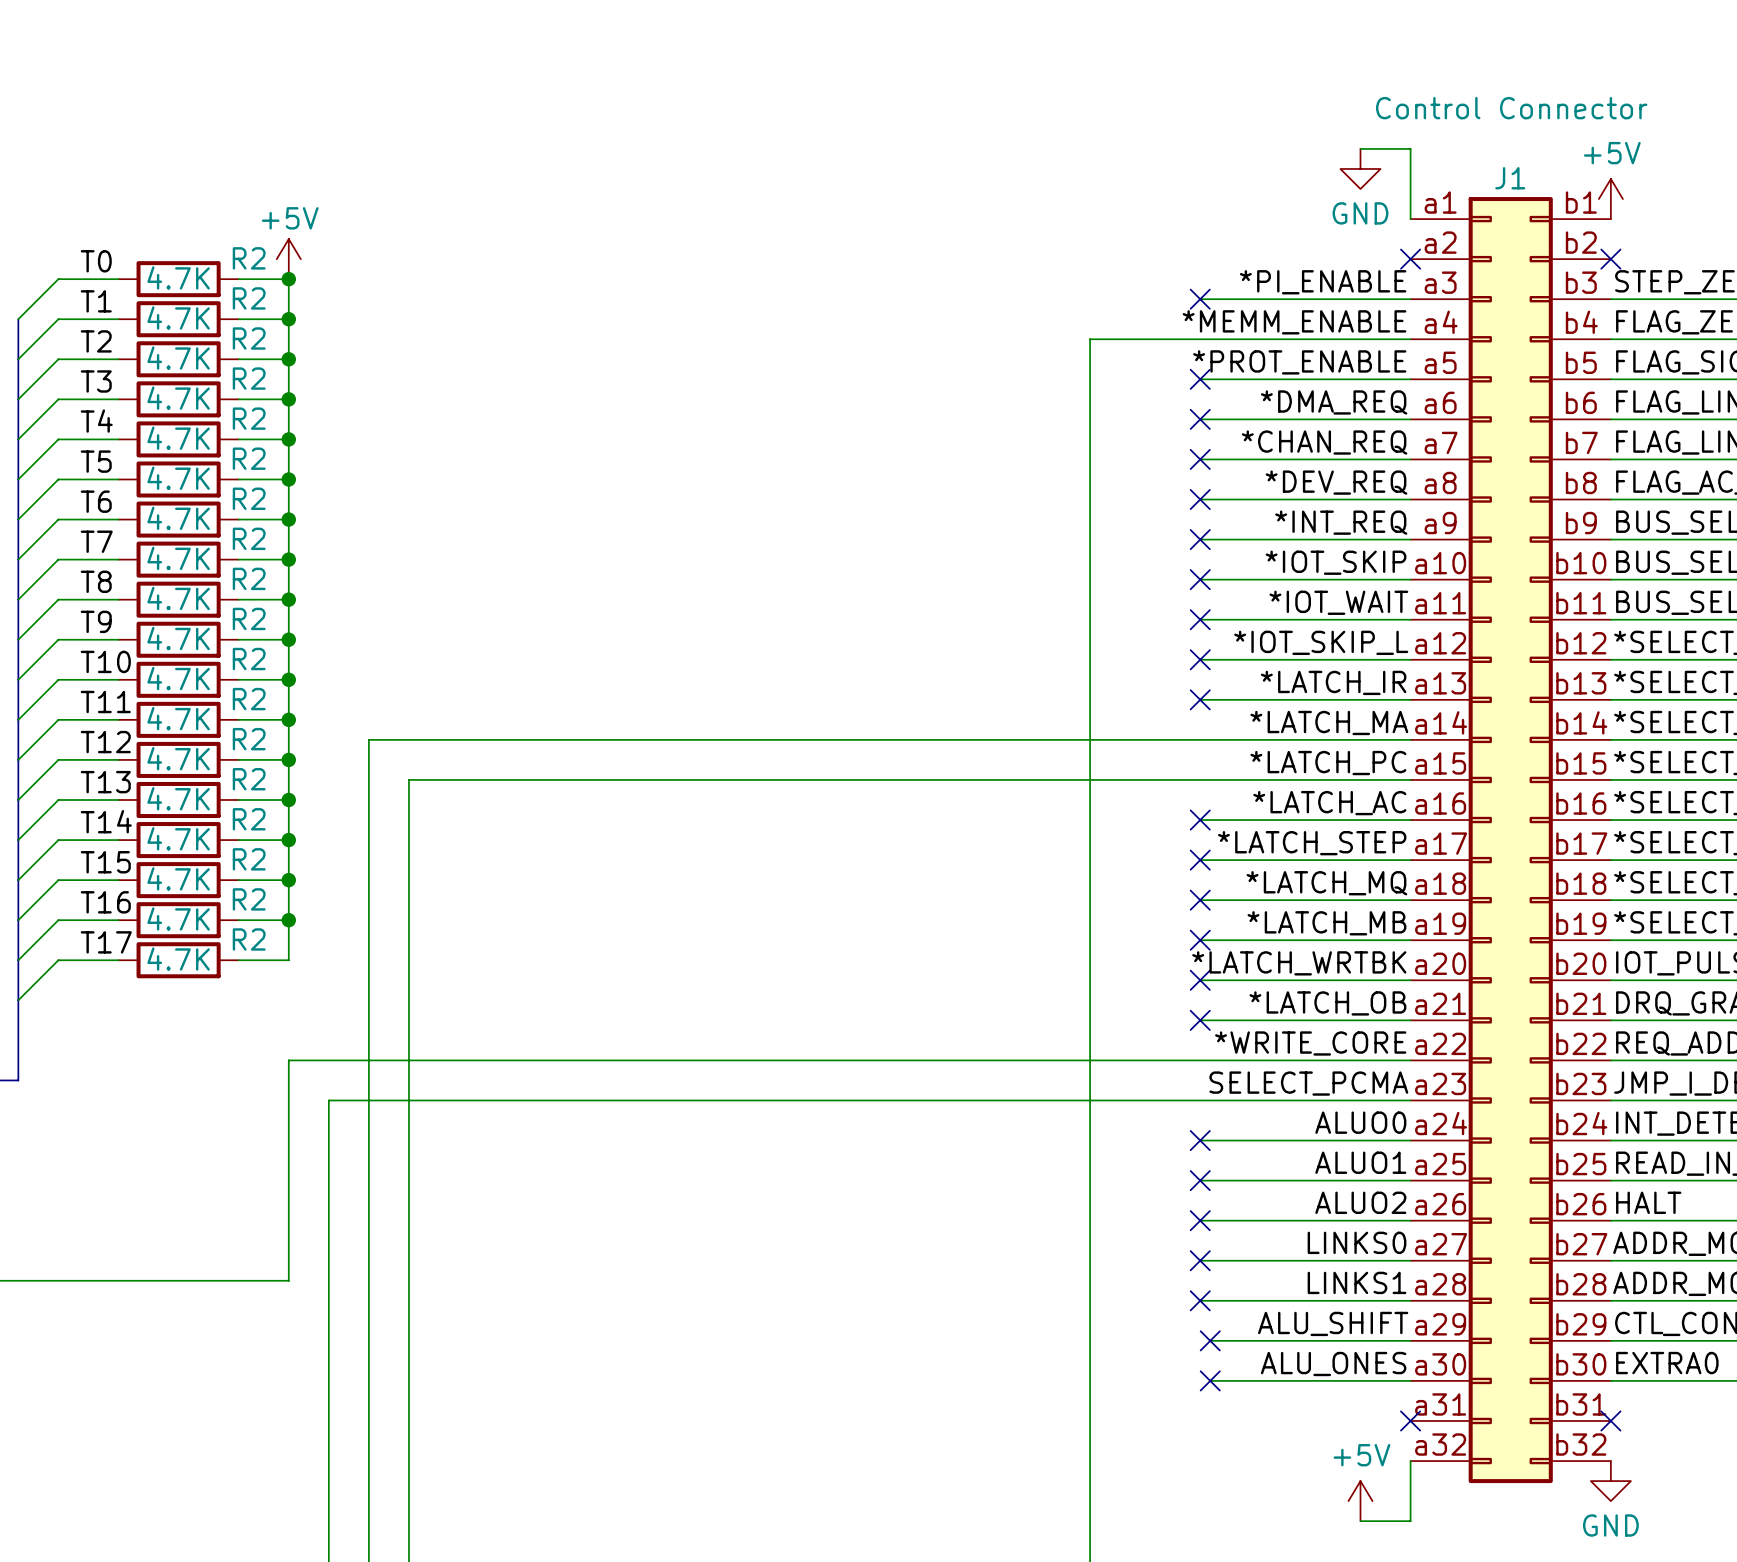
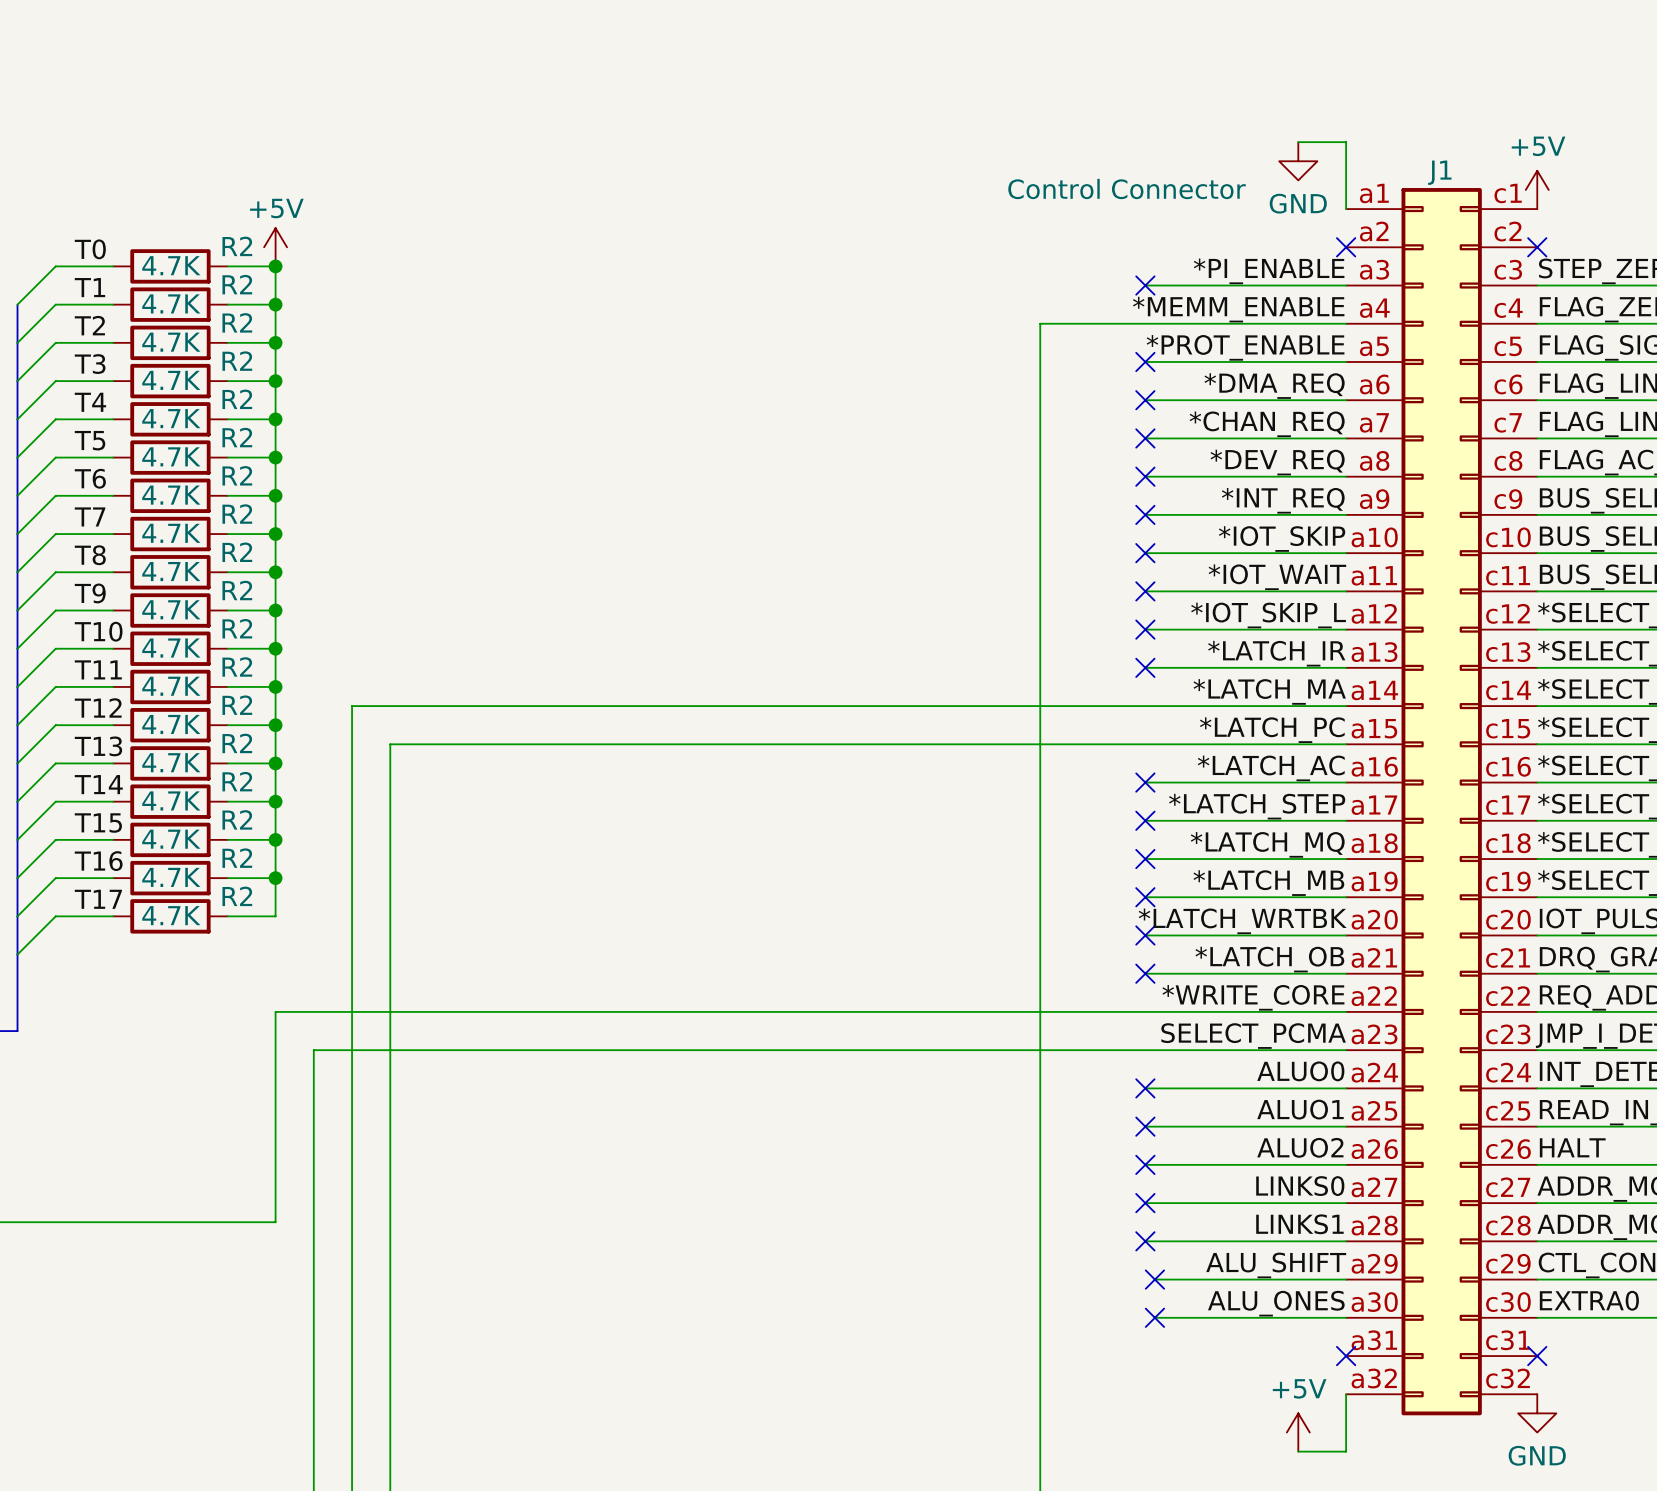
J1 value position: Control Connector (1511, 108) -> Control Connector (1127, 189)
J1 symbol: [1410, 197, 1611, 1484] -> [1346, 188, 1538, 1416]

